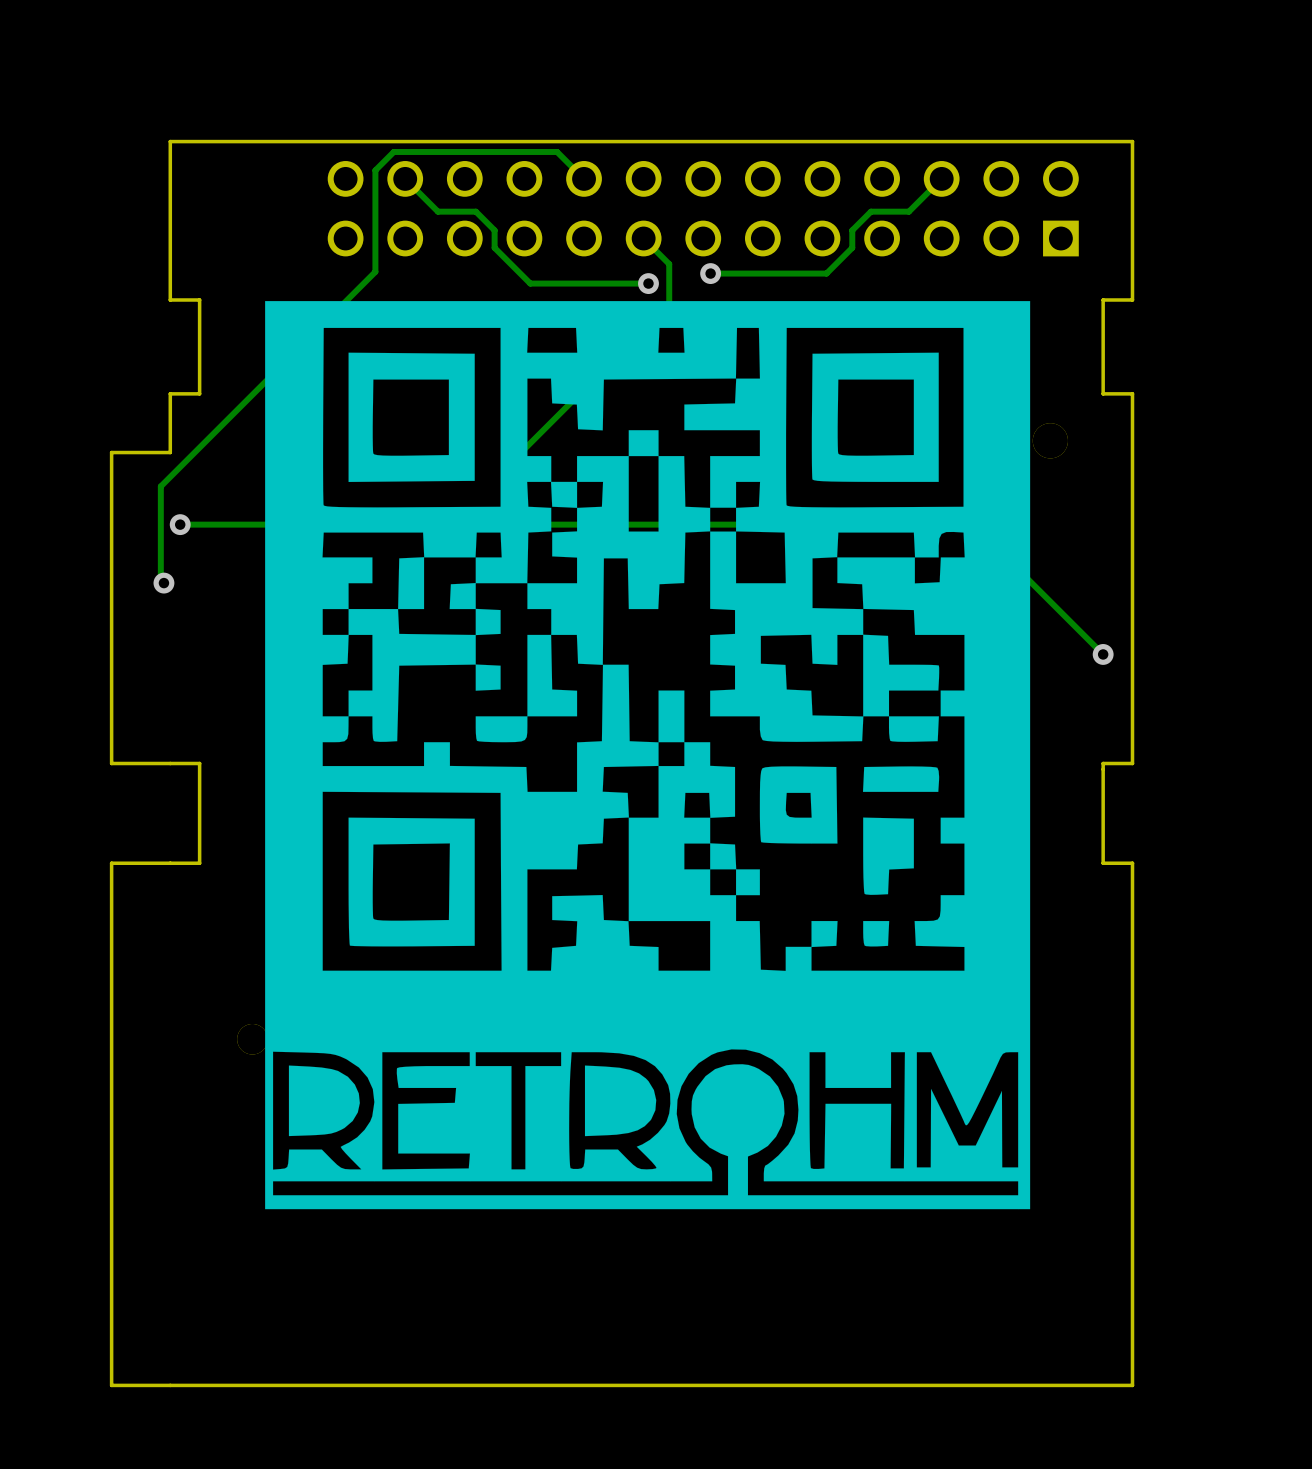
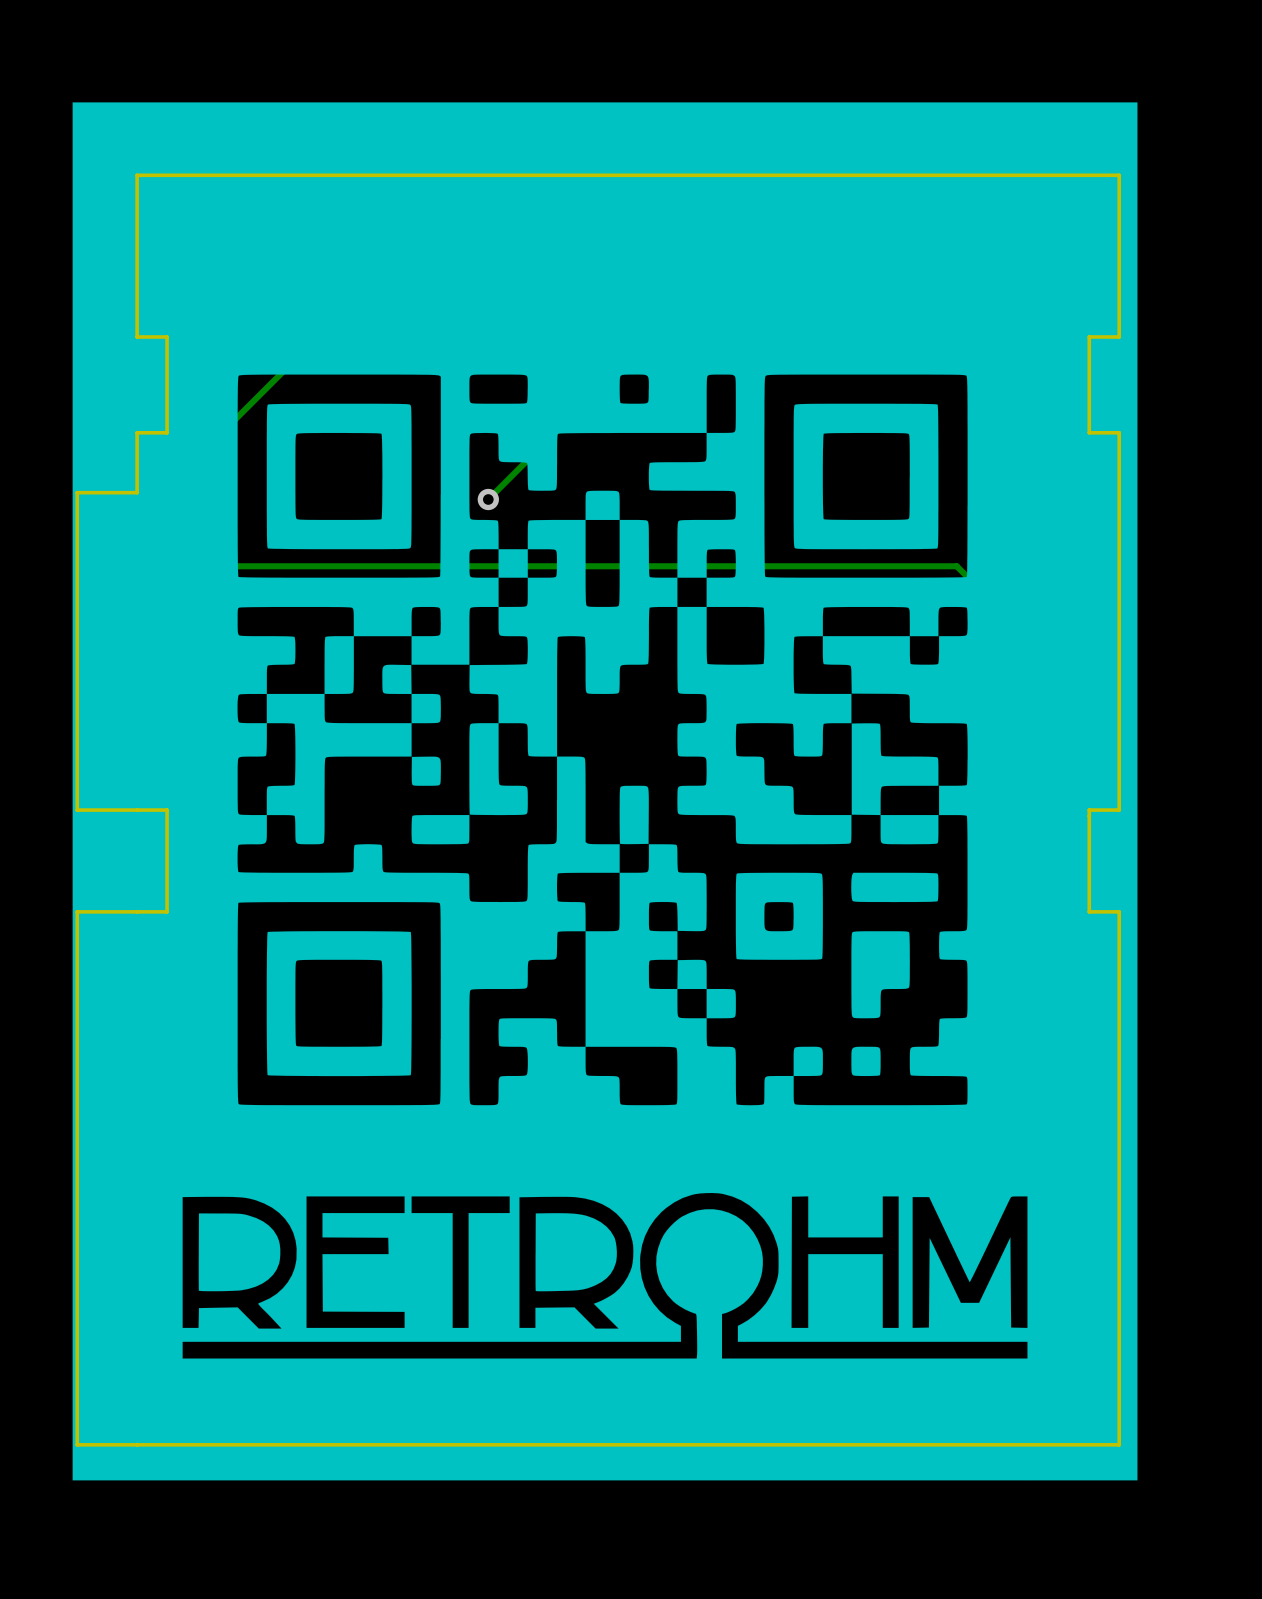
drawing shape: [265, 301, 1031, 1210] -> [72, 102, 1138, 1481]

